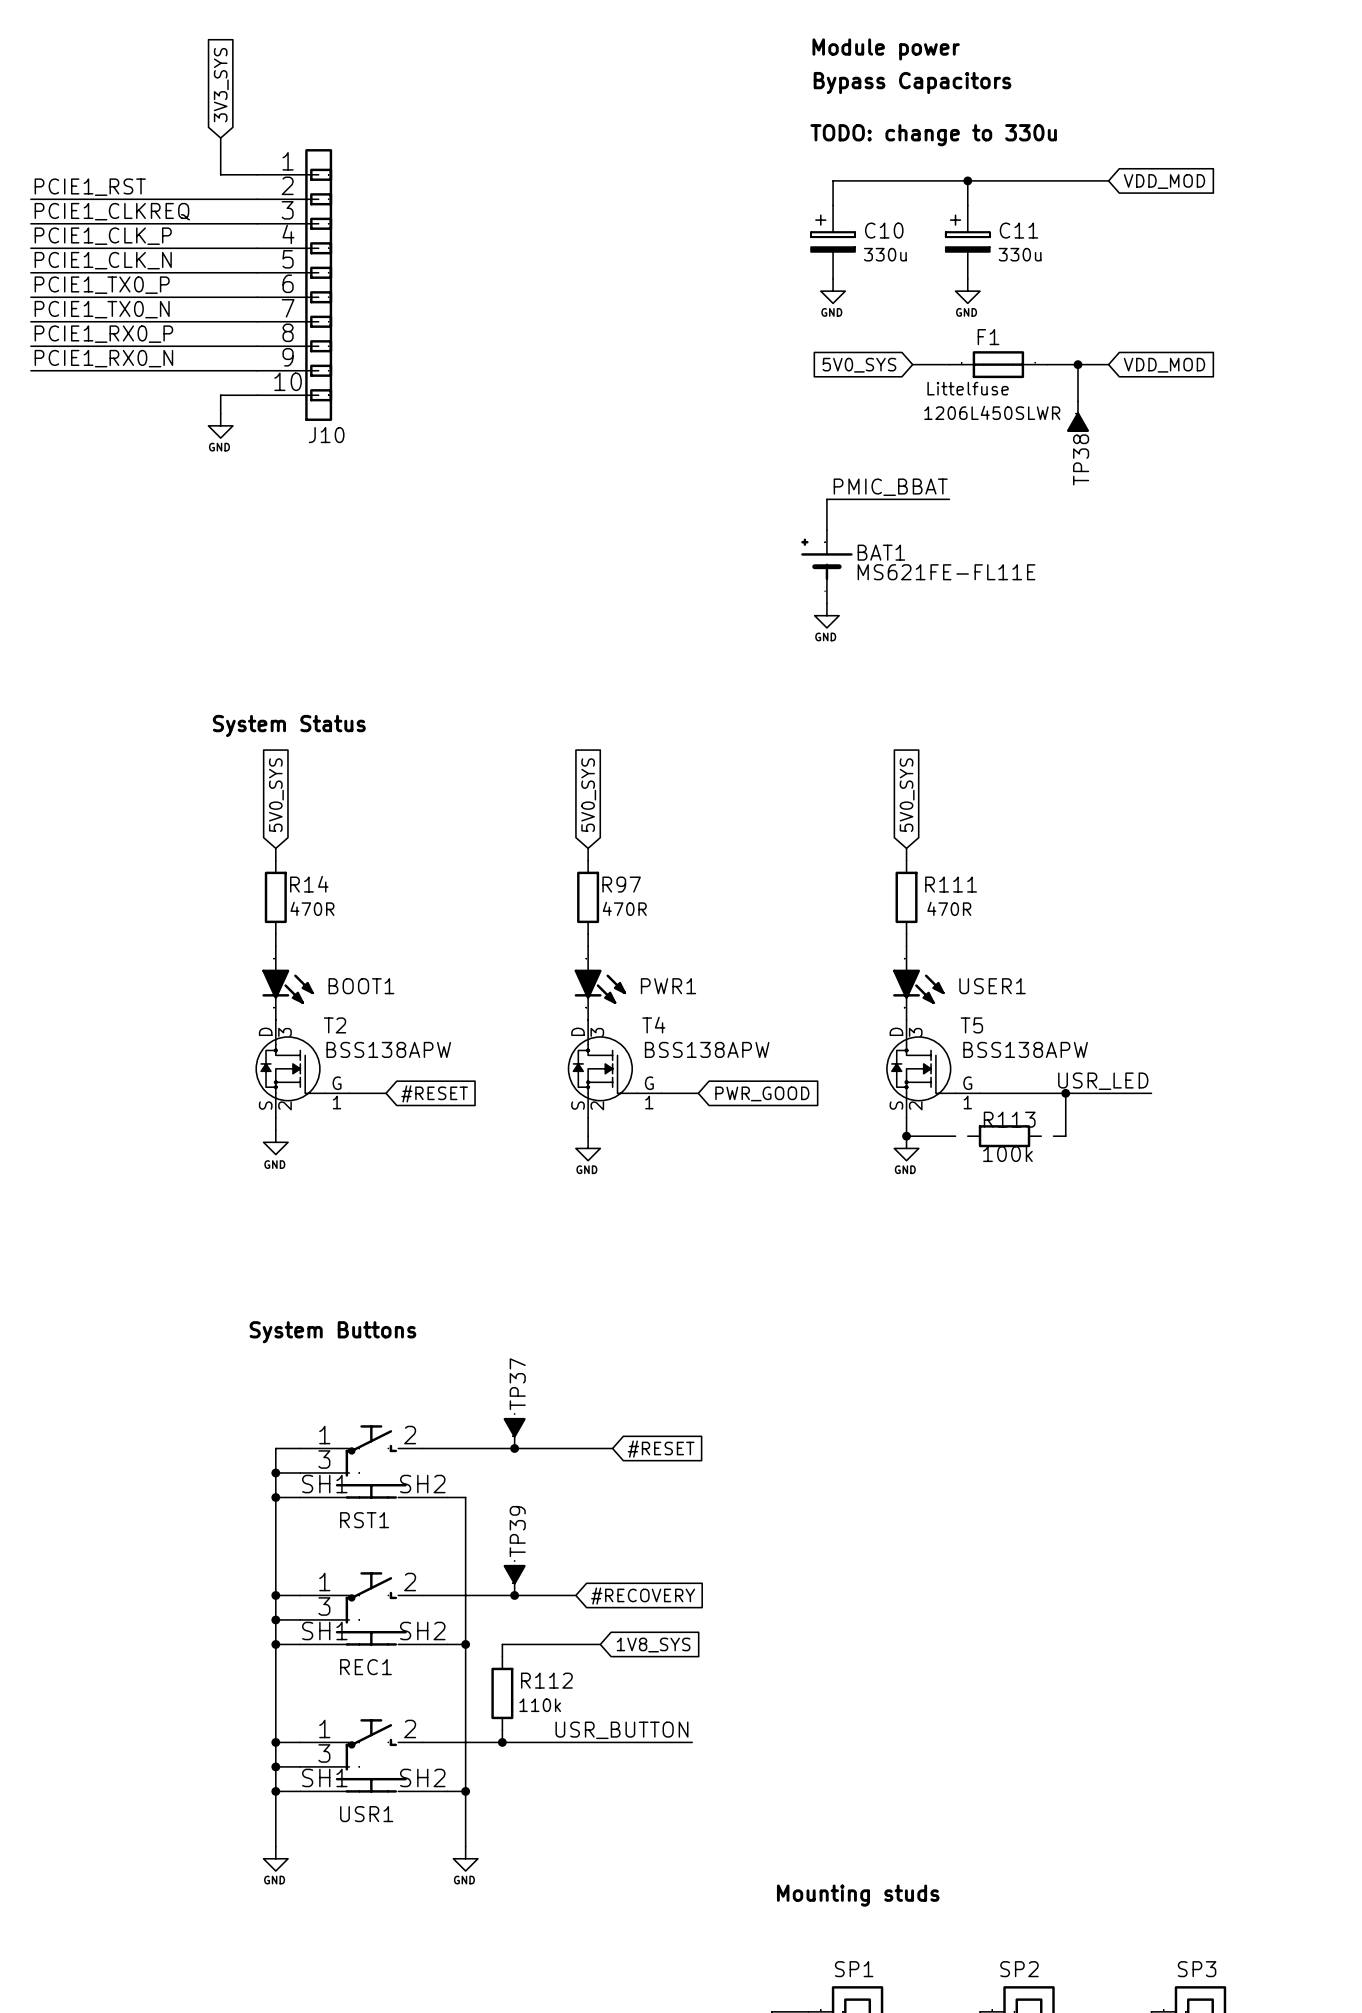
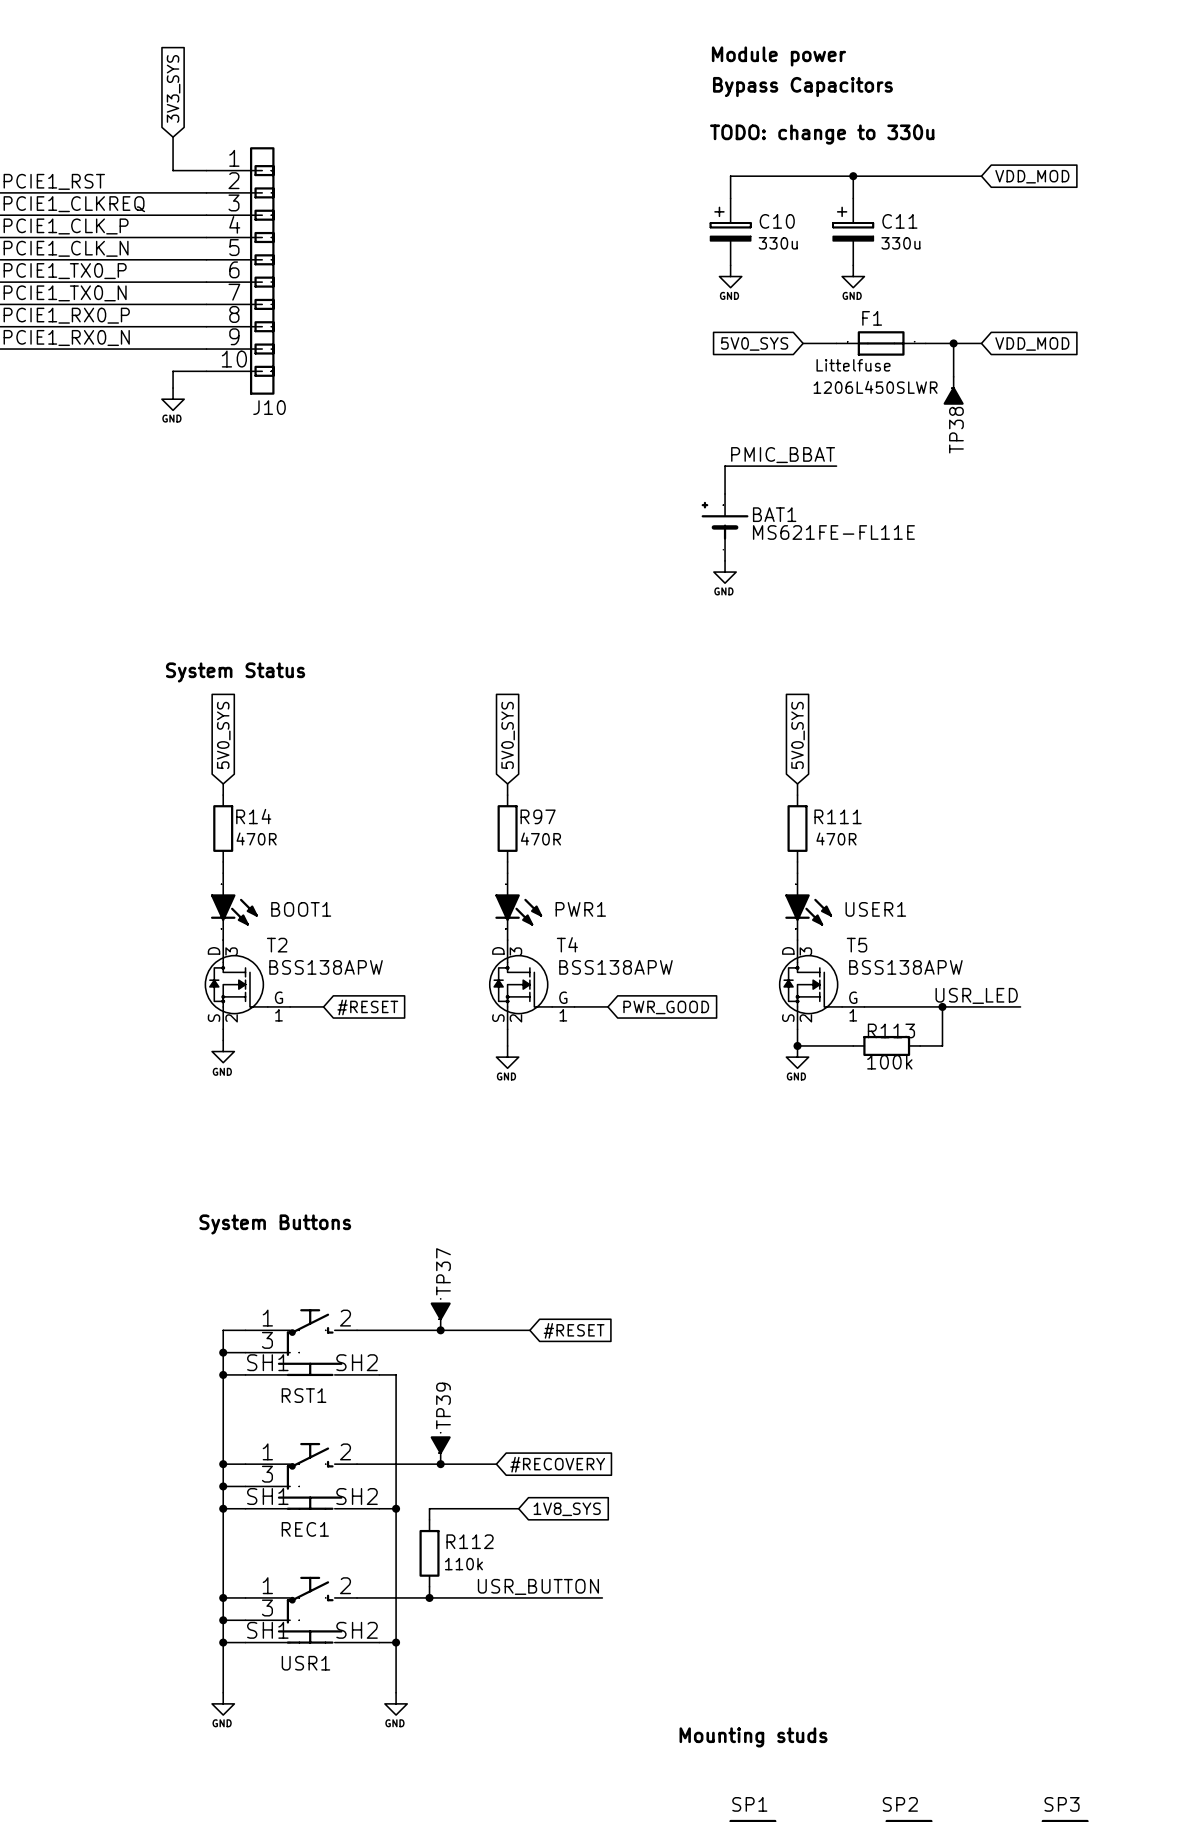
wire: none -> (842, 1045) (853, 1045)
wire: none -> (920, 1045) (931, 1045)

